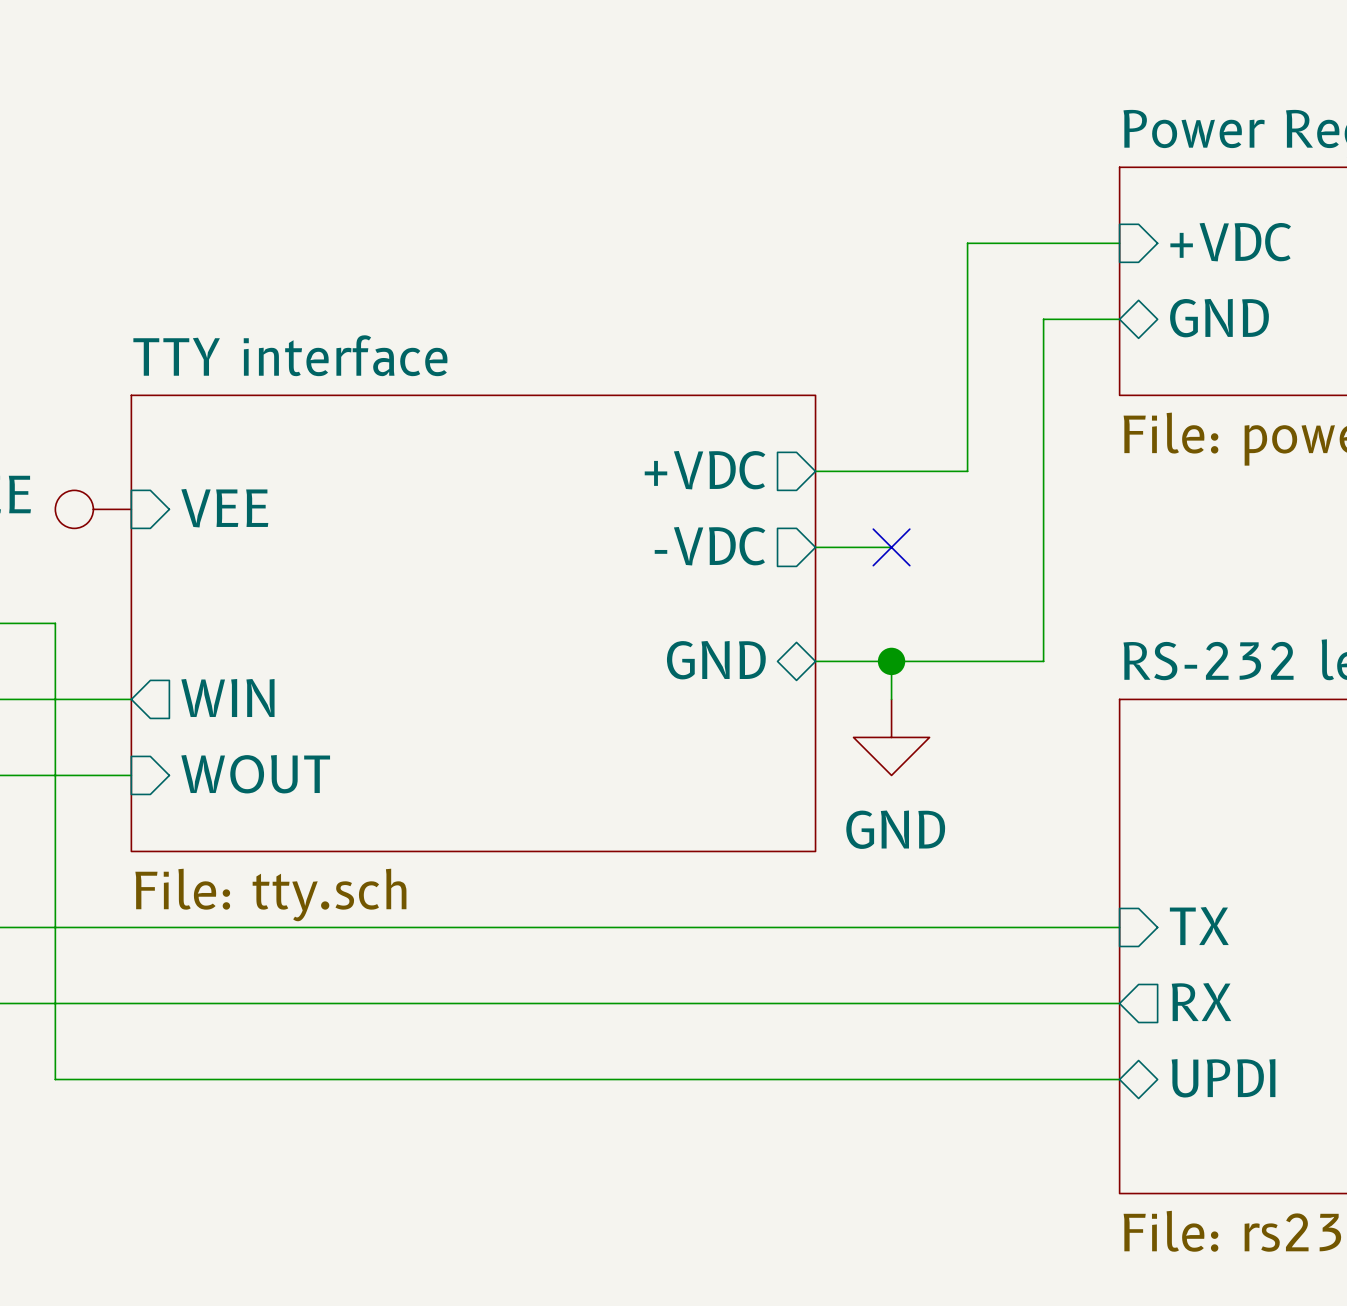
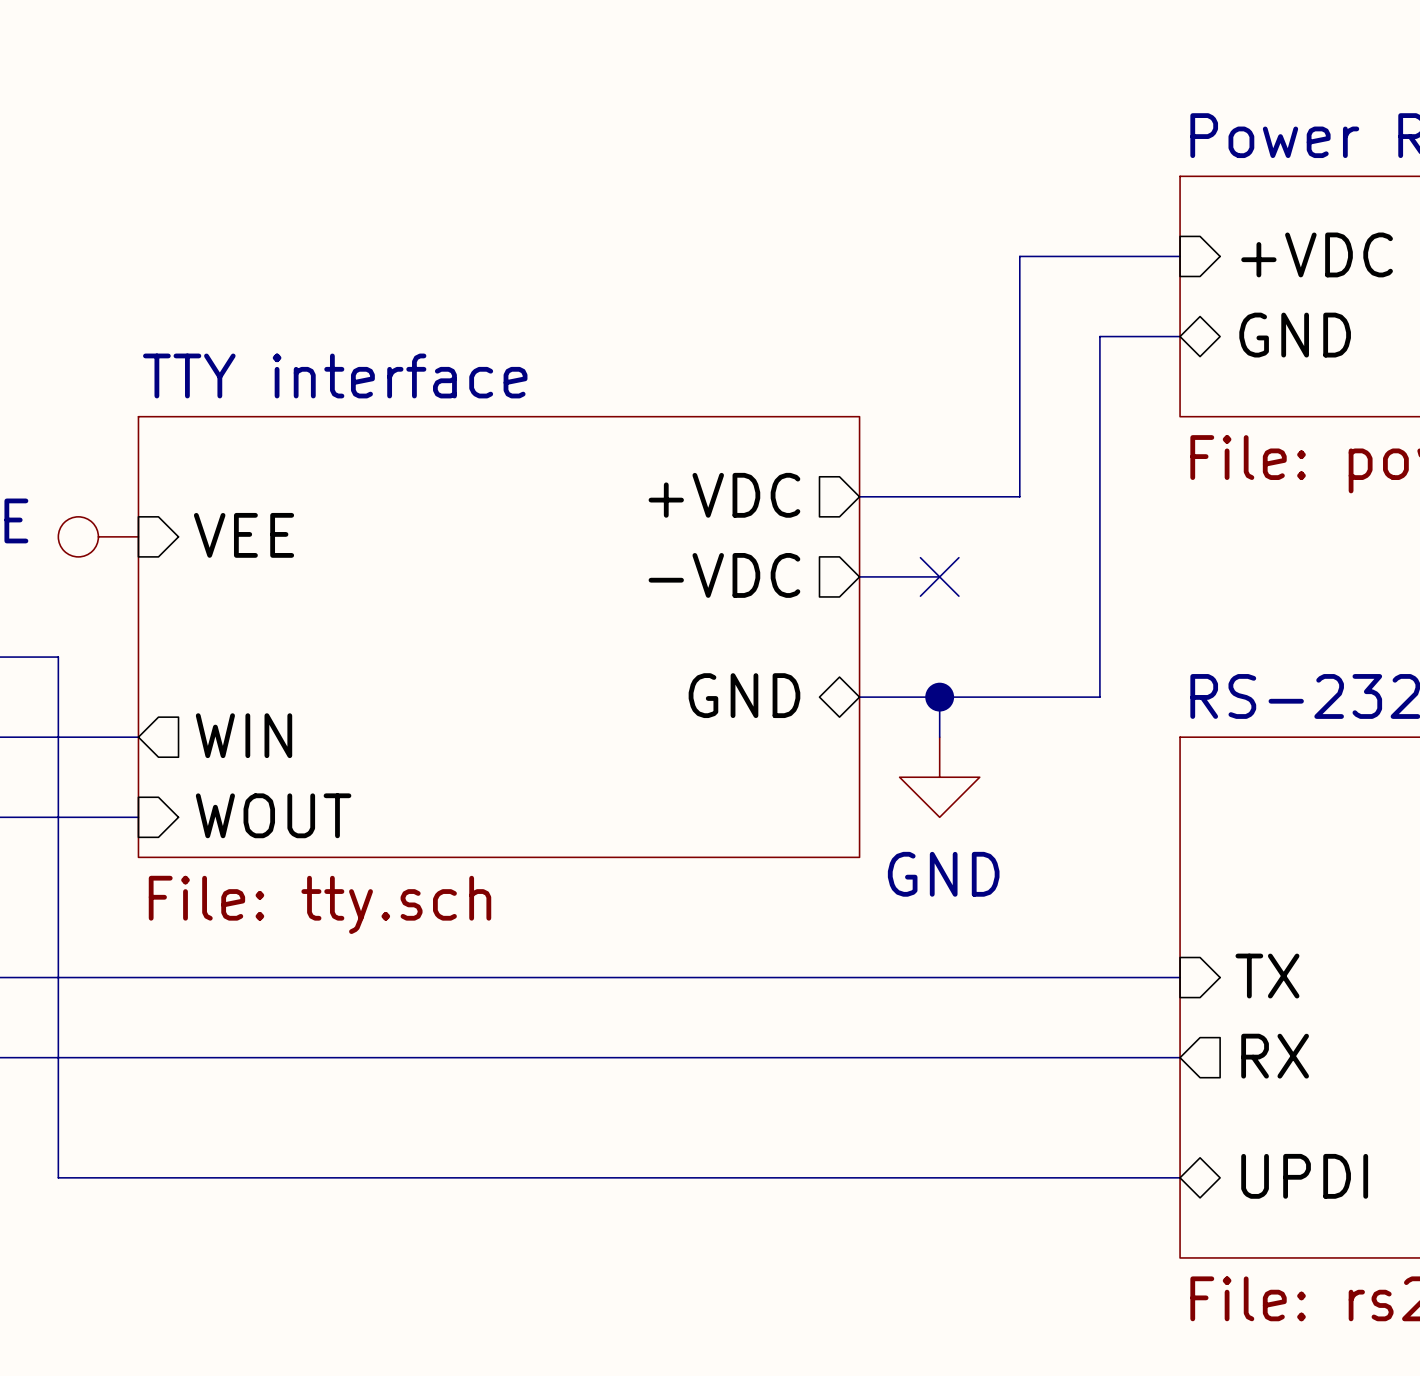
sheet TTY interface shape: [131, 395, 816, 852] -> [138, 416, 860, 858]
sheet pin position: UPDI (1223, 1078) -> UPDI (1304, 1176)
wire: (55, 1079) (1119, 1079) -> (58, 1137) (58, 1177) (1180, 1177)

